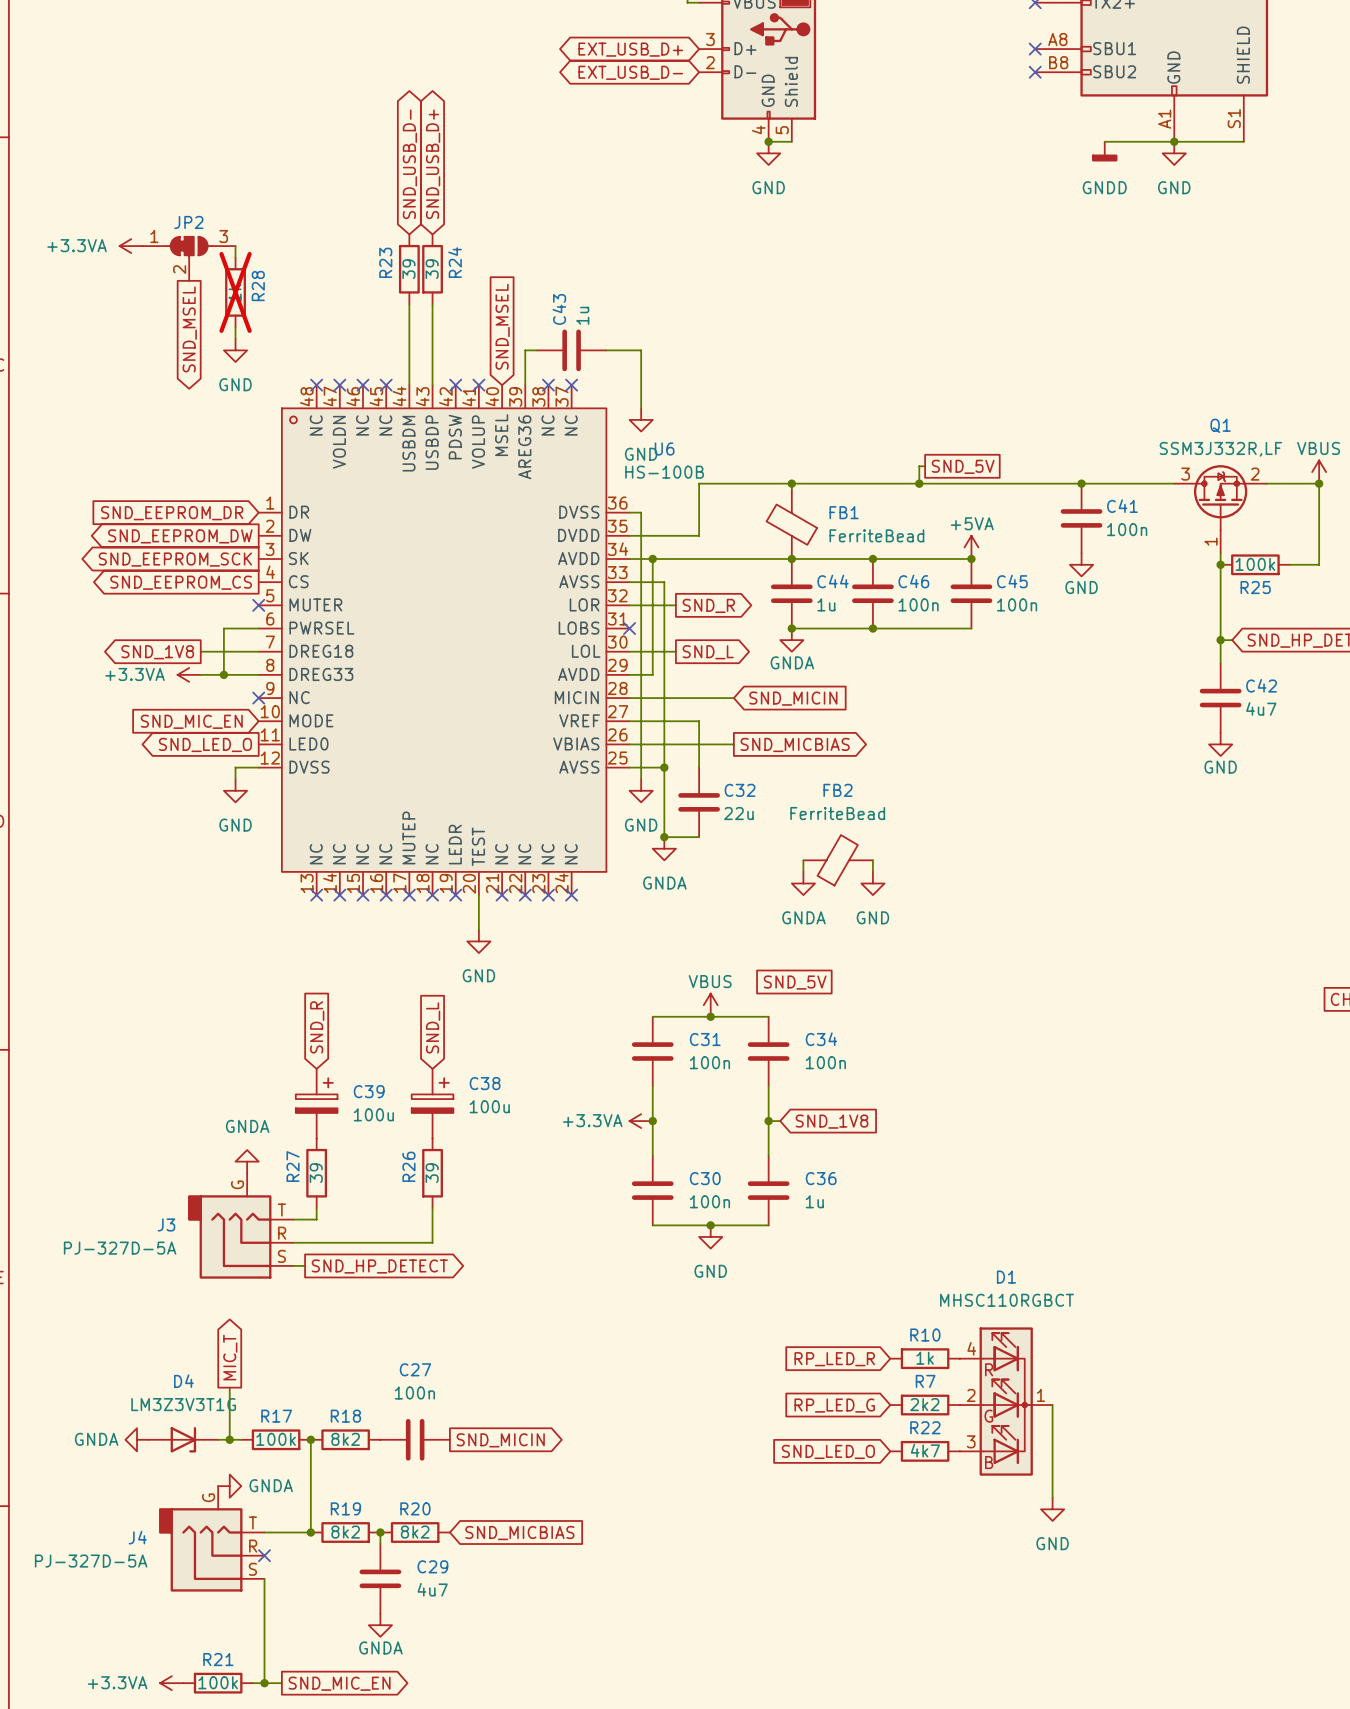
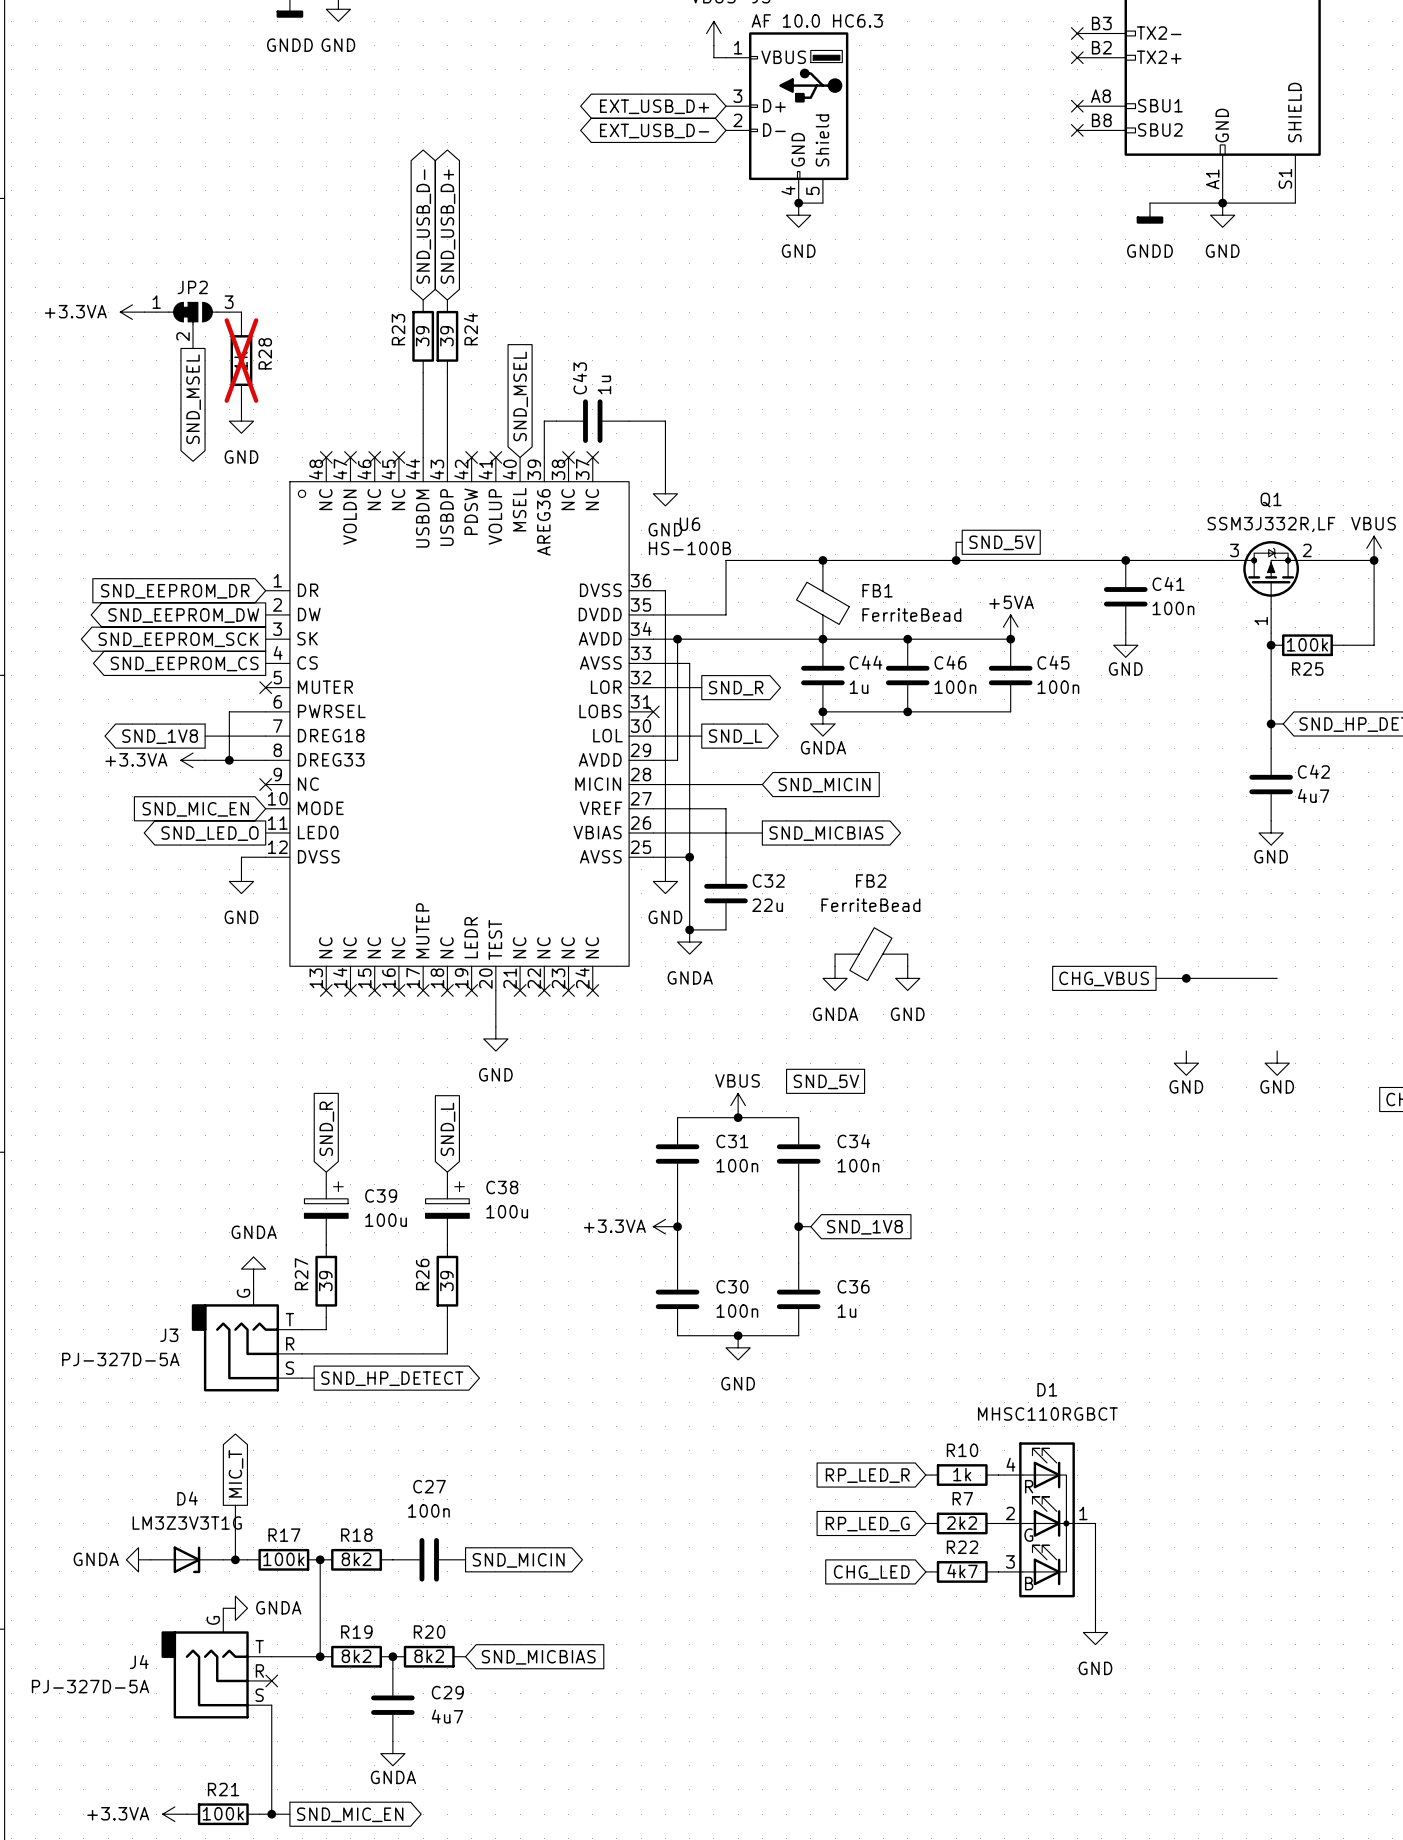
wire: none -> (1156, 978) (1277, 978)
junction: none -> (1186, 978)
global label: none -> CHG_VBUS (1104, 978)
power symbol: none -> GND (1186, 1063)
power symbol: none -> GND (1277, 1063)
global label: SND_LED_O (828, 1451) -> CHG_LED (871, 1572)

